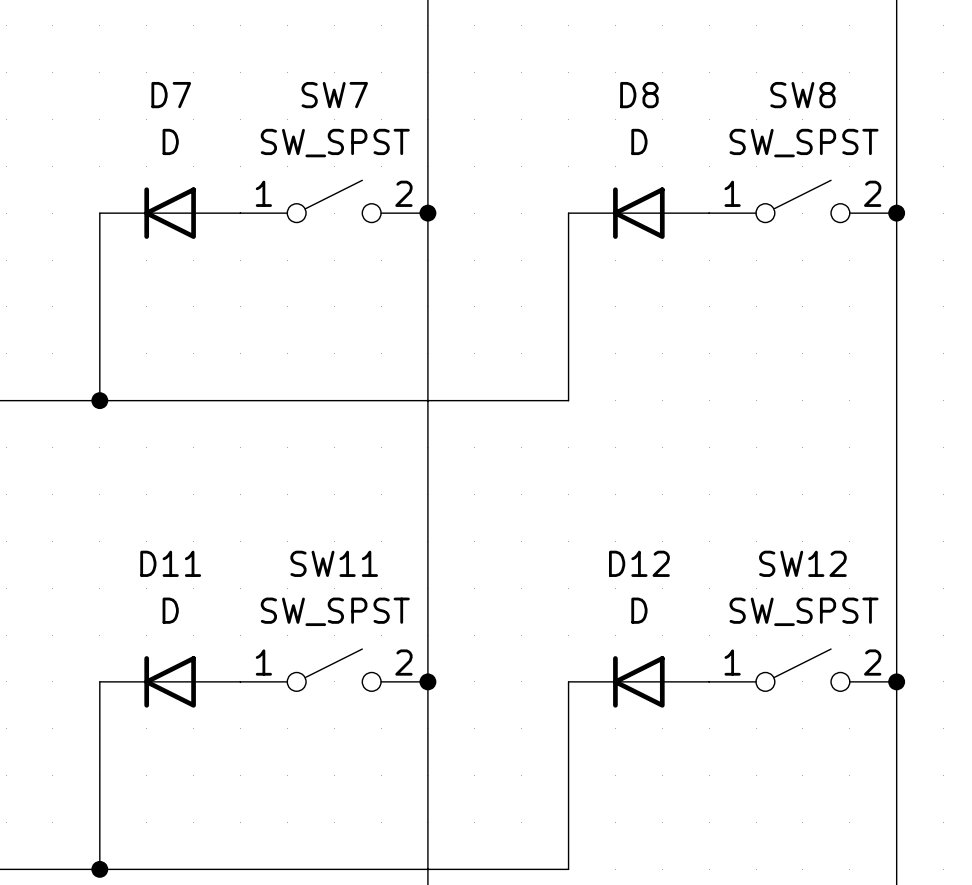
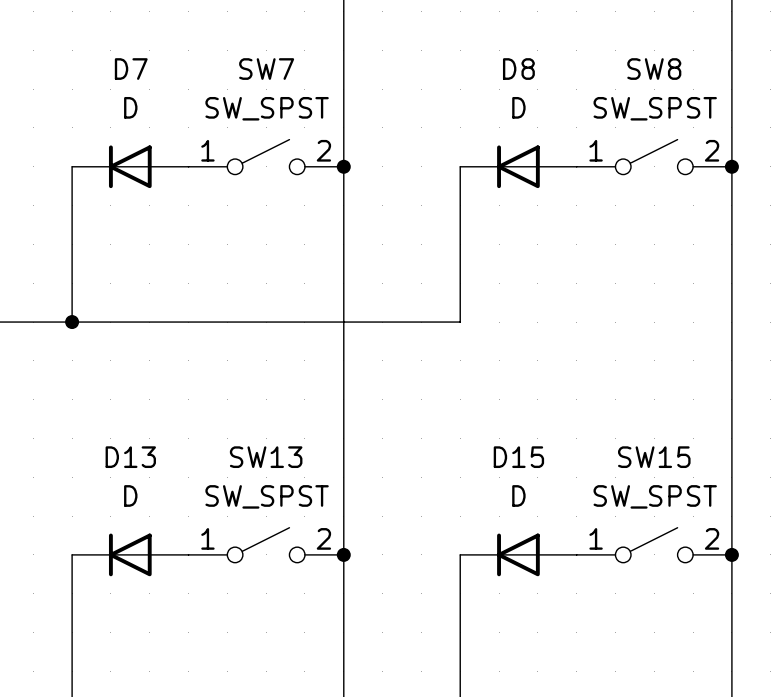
D11 name: D11 (170, 563) -> D13 (130, 457)
SW11 name: SW11 (334, 563) -> SW13 (266, 457)
D12 name: D12 (639, 563) -> D15 (518, 457)
SW12 name: SW12 (802, 563) -> SW15 (654, 457)

